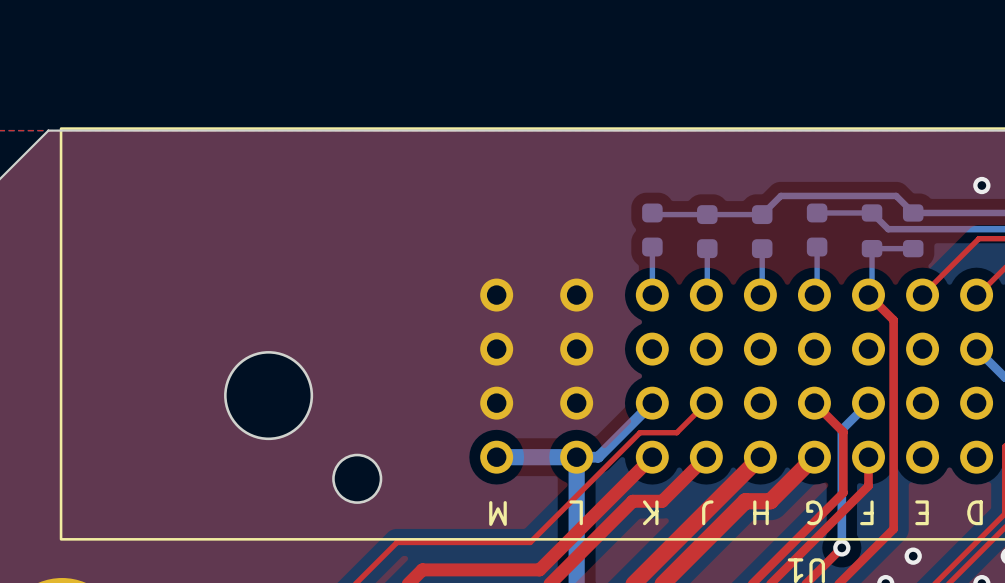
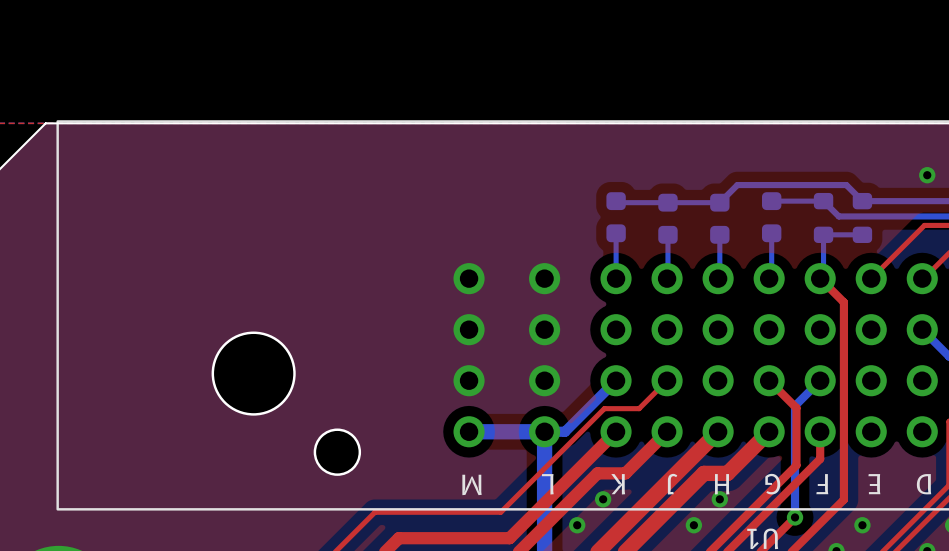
via: none -> (603, 499)
via: none -> (719, 499)
via: none -> (577, 525)
via: none -> (693, 525)

